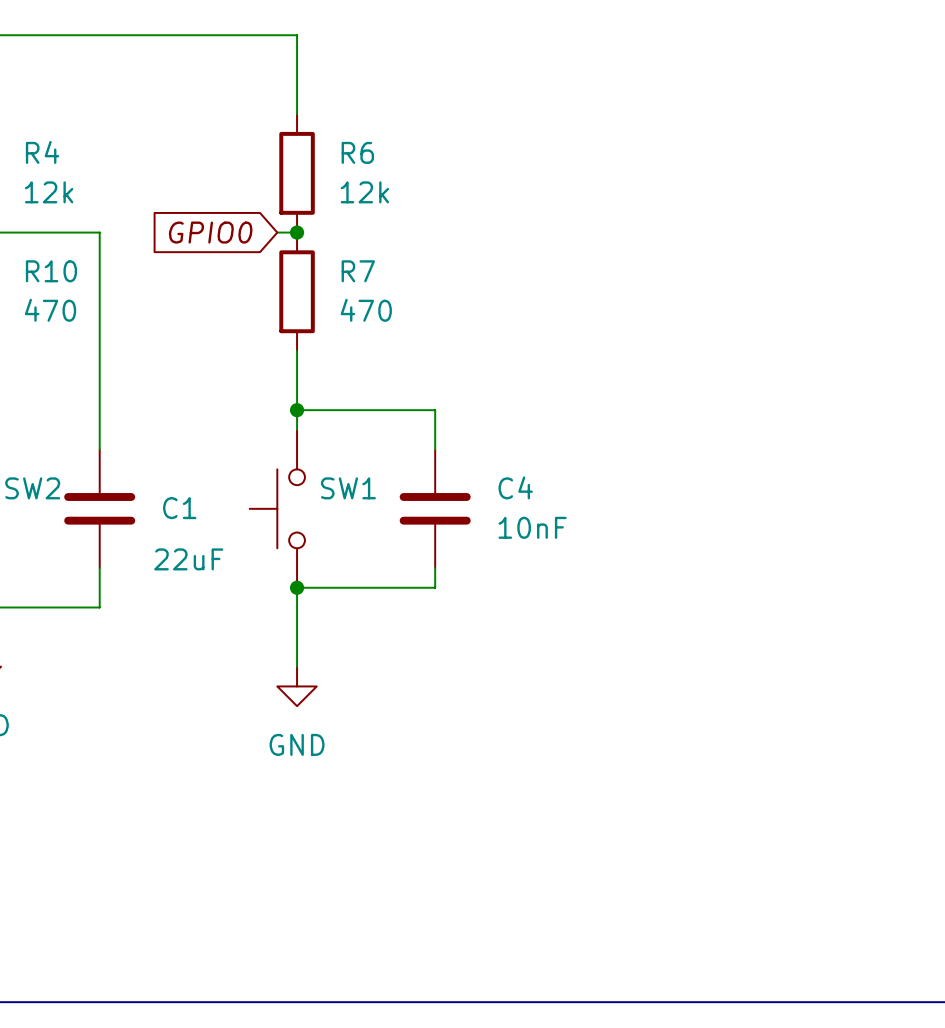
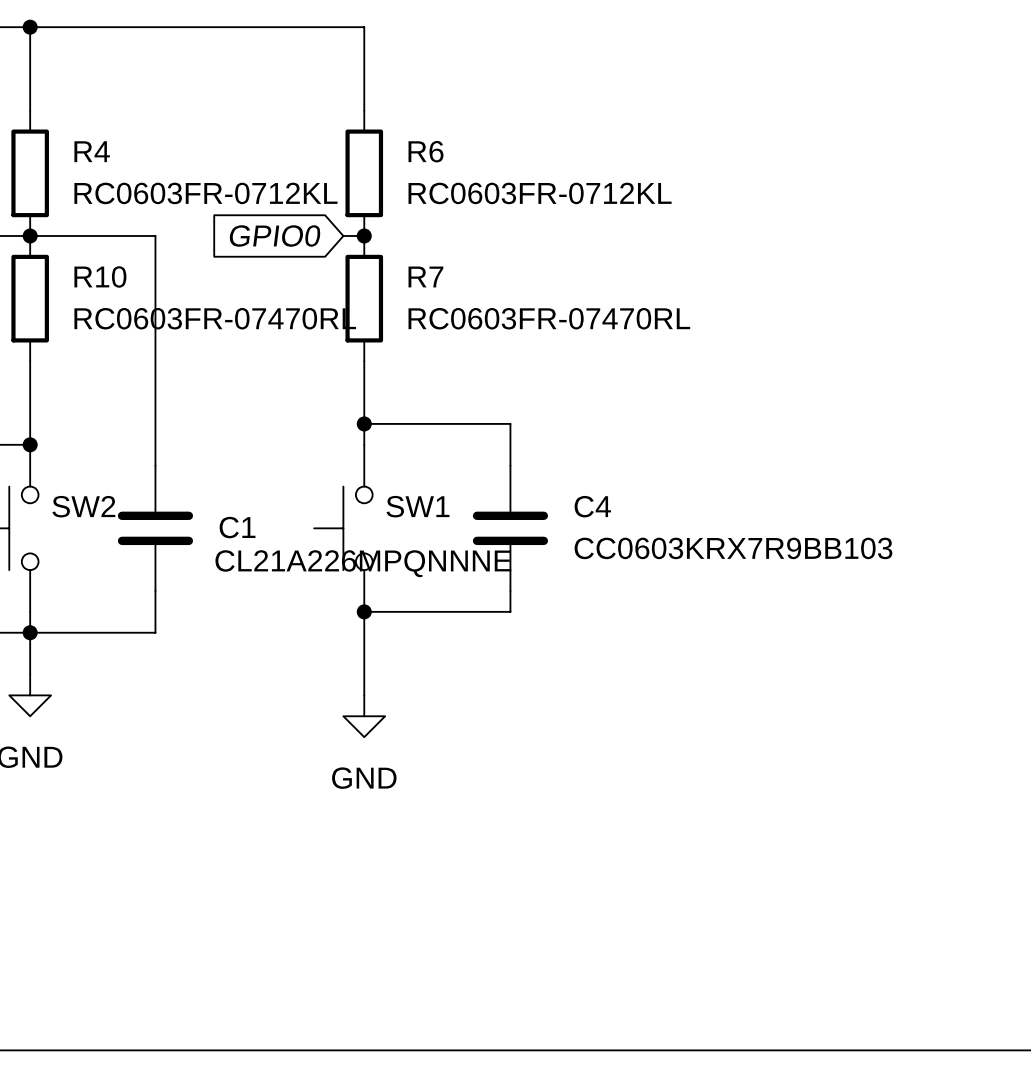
R4 value: 12k (49, 192) -> RC0603FR-0712KL (205, 193)
R6 value: 12k (364, 192) -> RC0603FR-0712KL (540, 193)
R10 value: 470 (50, 310) -> RC0603FR-07470RL (215, 318)
R7 value: 470 (366, 310) -> RC0603FR-07470RL (549, 318)
C4 value: 10nF (532, 527) -> CC0603KRX7R9BB103 (733, 548)
C1 value: 22uF (188, 559) -> CL21A226MPQNNNE (363, 563)

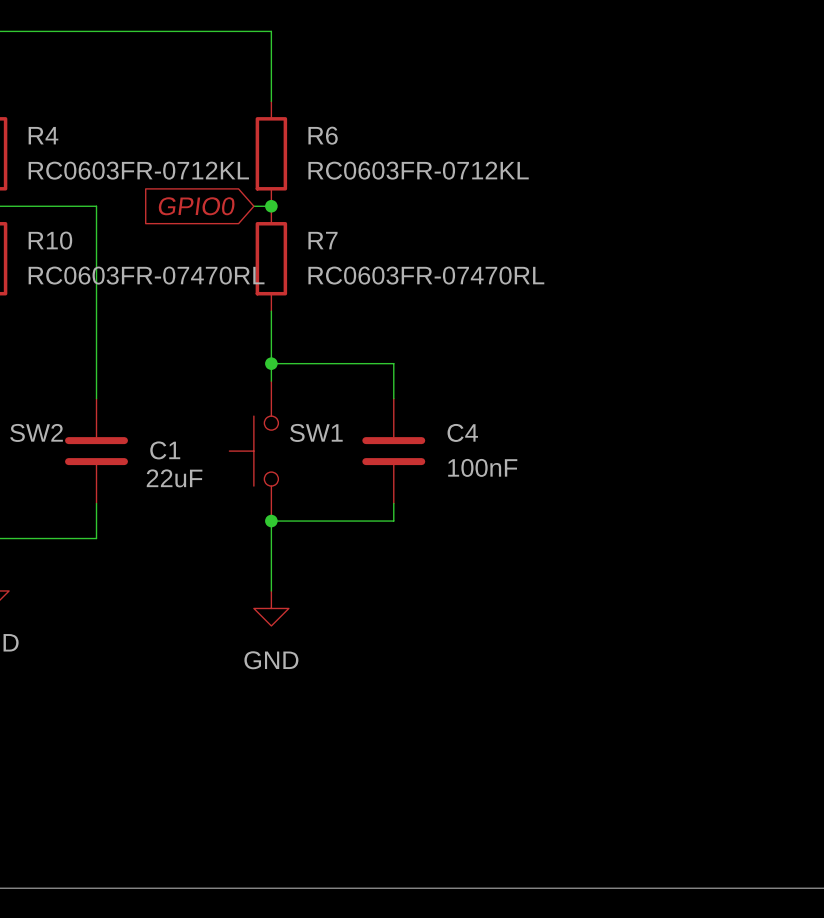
C4 value: CC0603KRX7R9BB103 (733, 548) -> 100nF (482, 467)
C1 value: CL21A226MPQNNNE (363, 563) -> 22uF (174, 478)

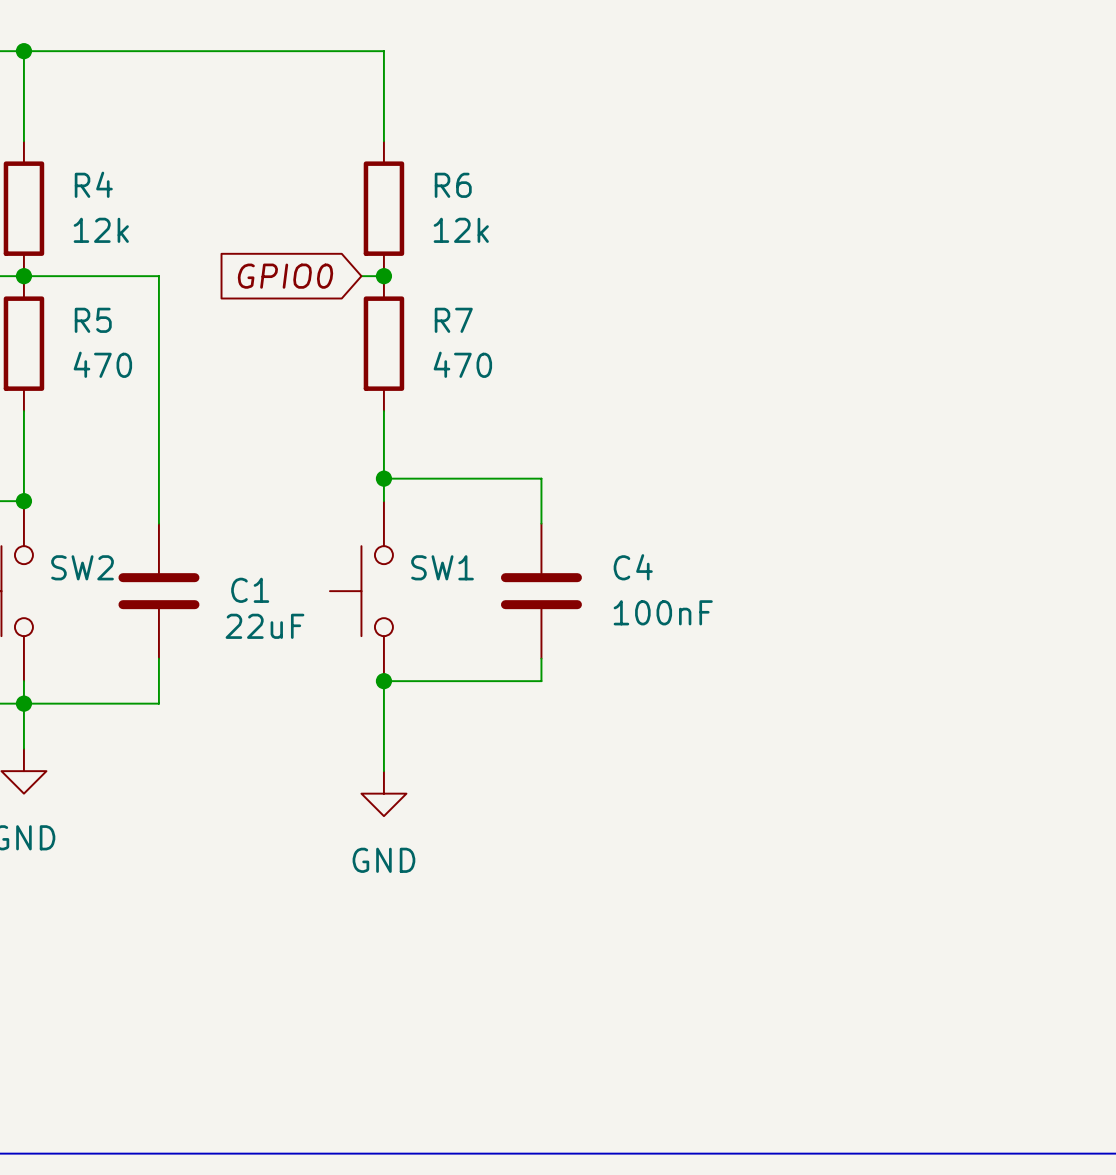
R4 value: RC0603FR-0712KL (138, 170) -> 12k (101, 230)
R6 value: RC0603FR-0712KL (418, 170) -> 12k (461, 230)
R10 name: R10 (50, 240) -> R5 (93, 320)
R10 value: RC0603FR-07470RL (146, 275) -> 470 (102, 364)
R7 value: RC0603FR-07470RL (426, 275) -> 470 (462, 364)

